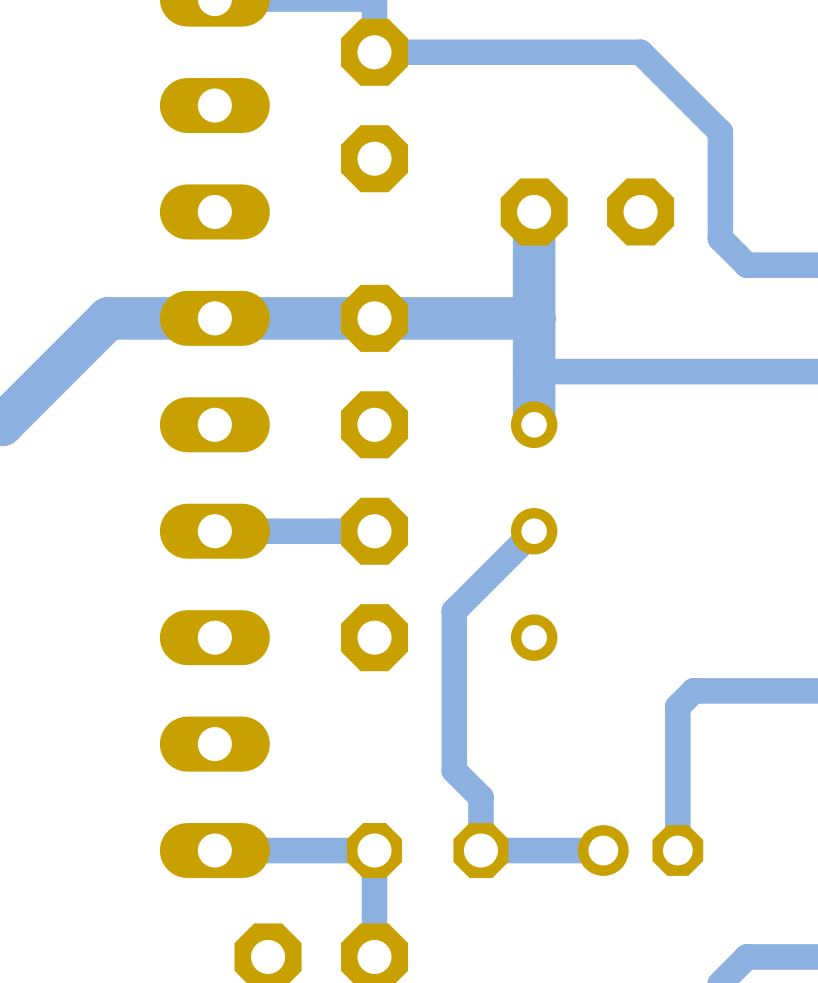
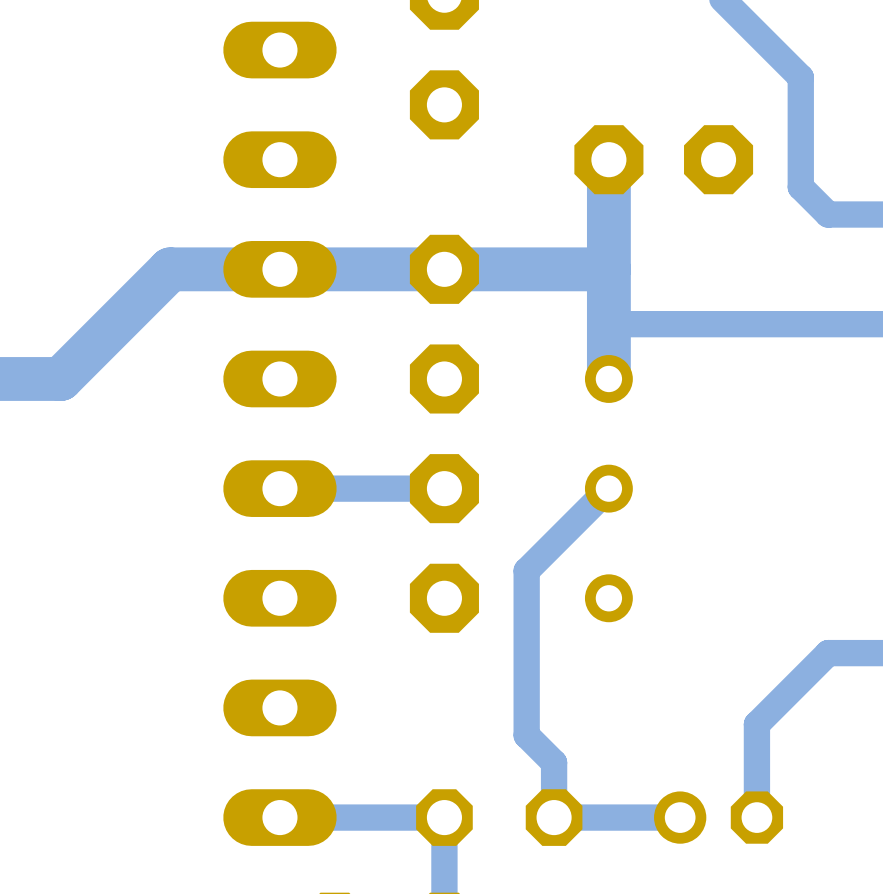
bottom track: (747, 690) (693, 690) (677, 706) (677, 760) -> (828, 653) (756, 724)

